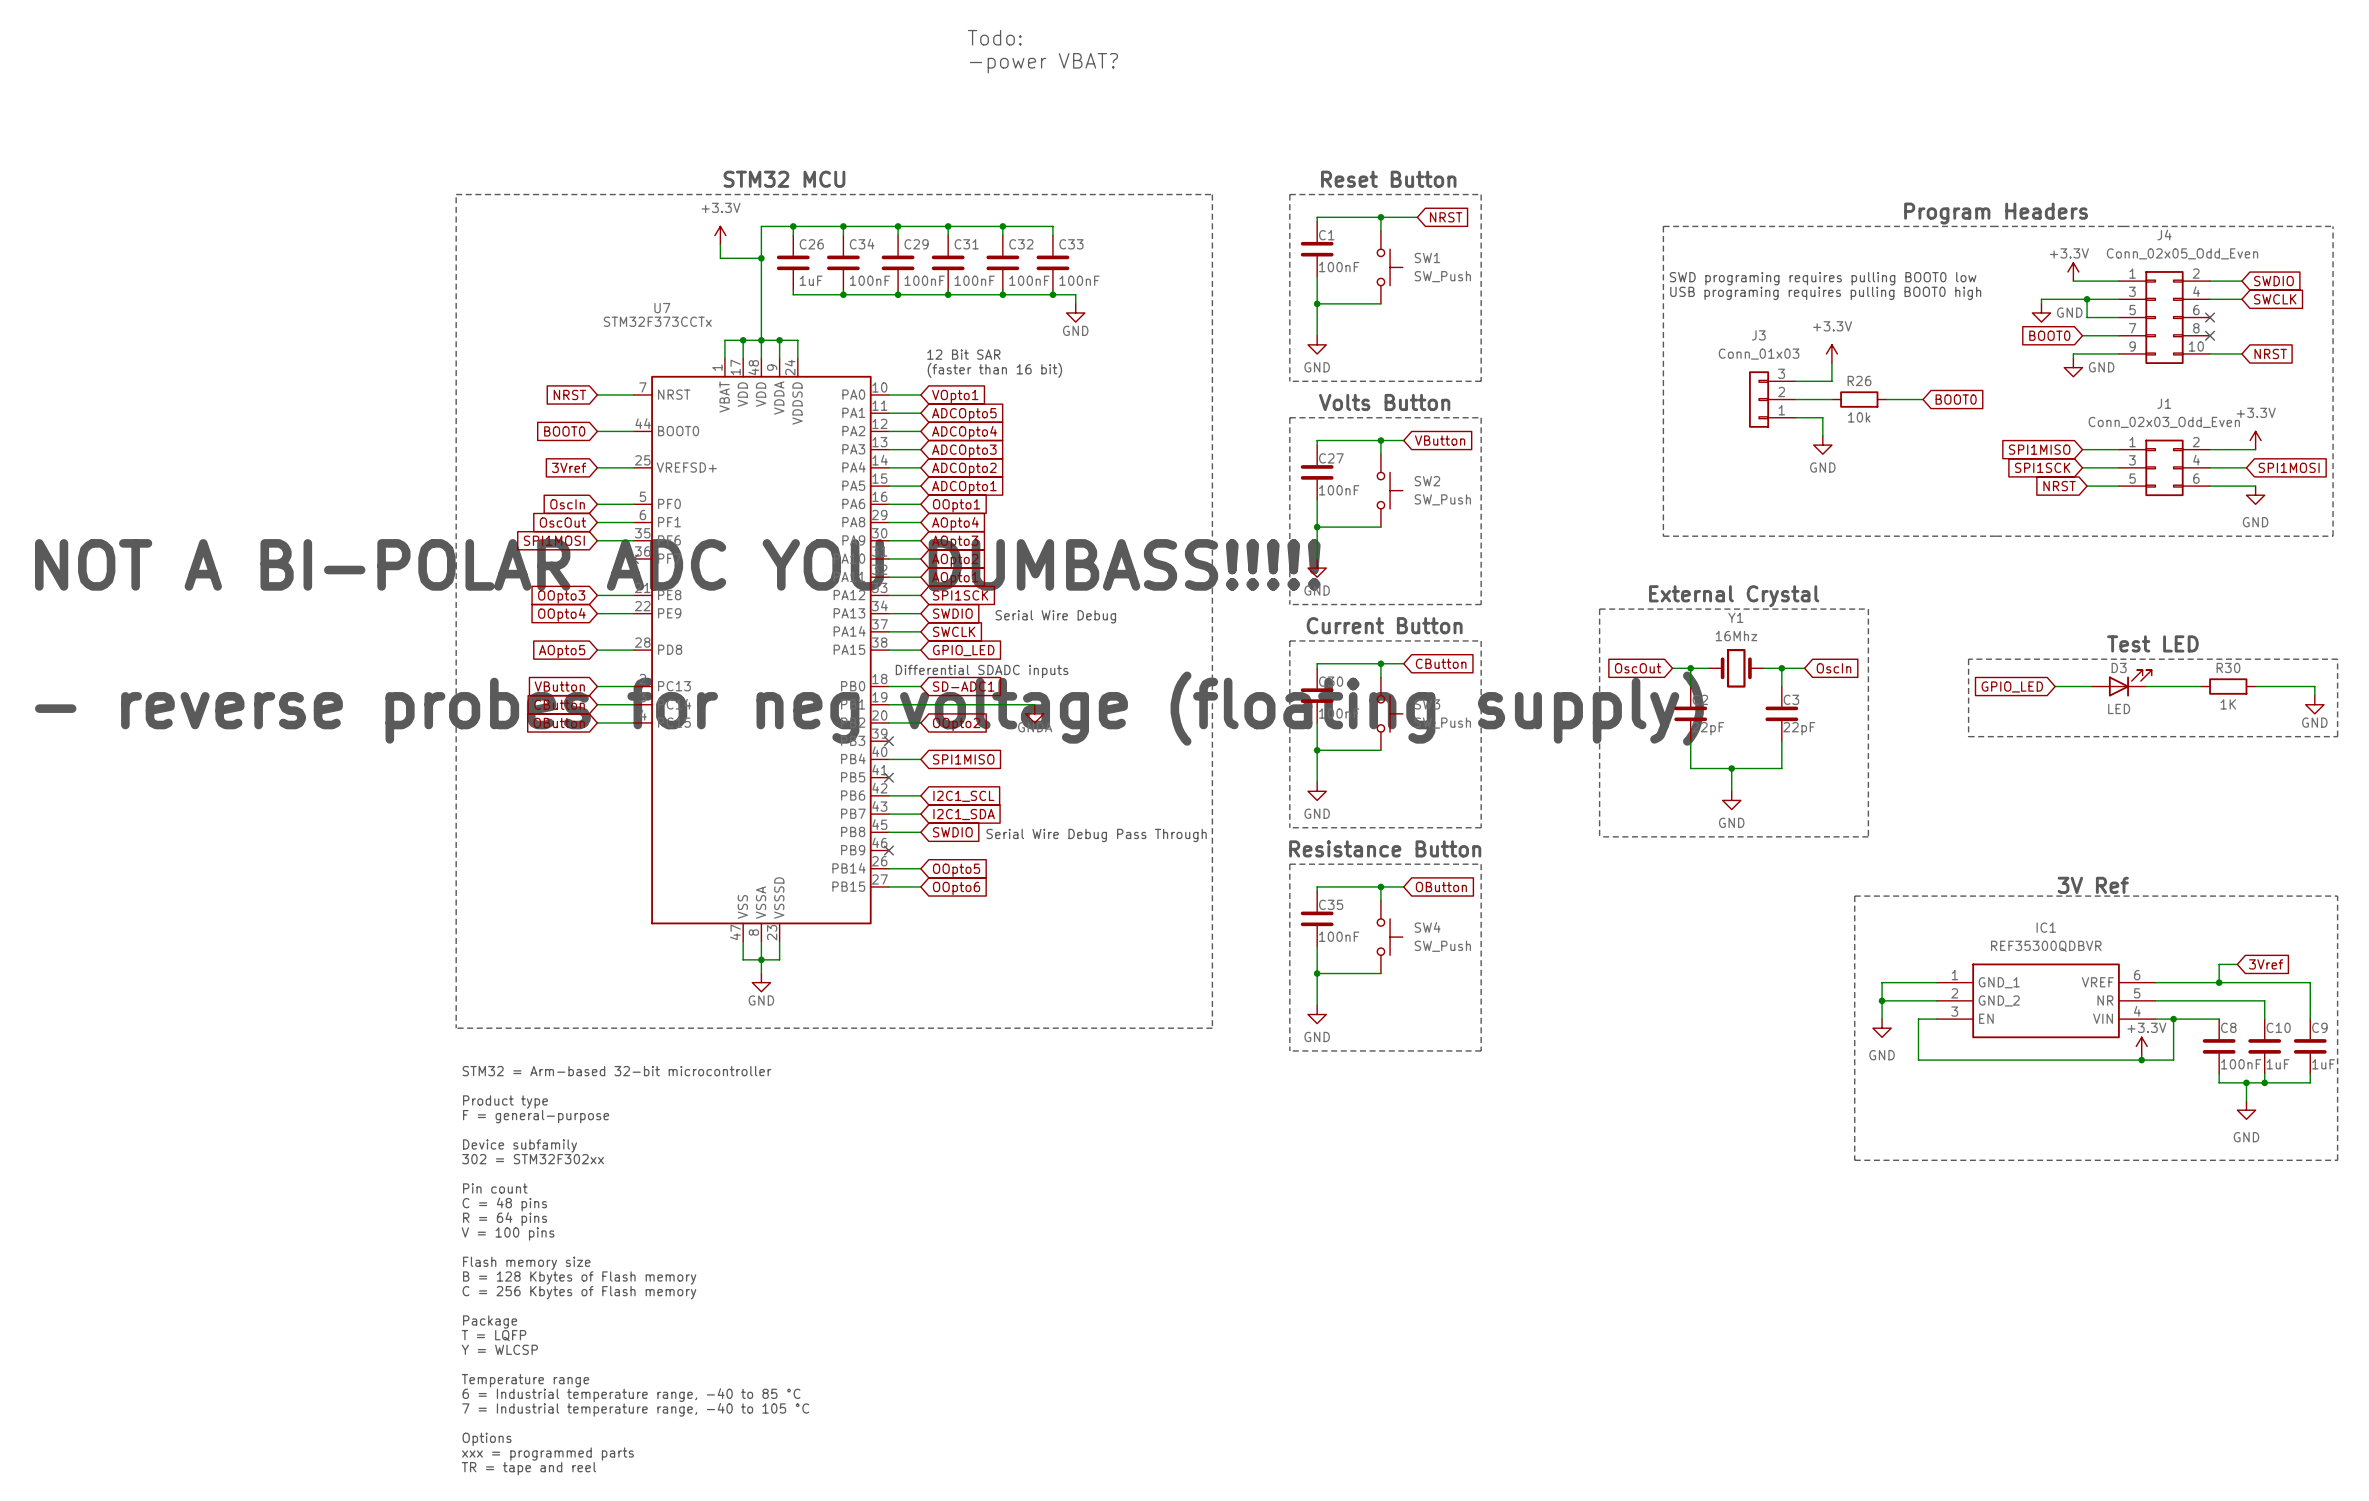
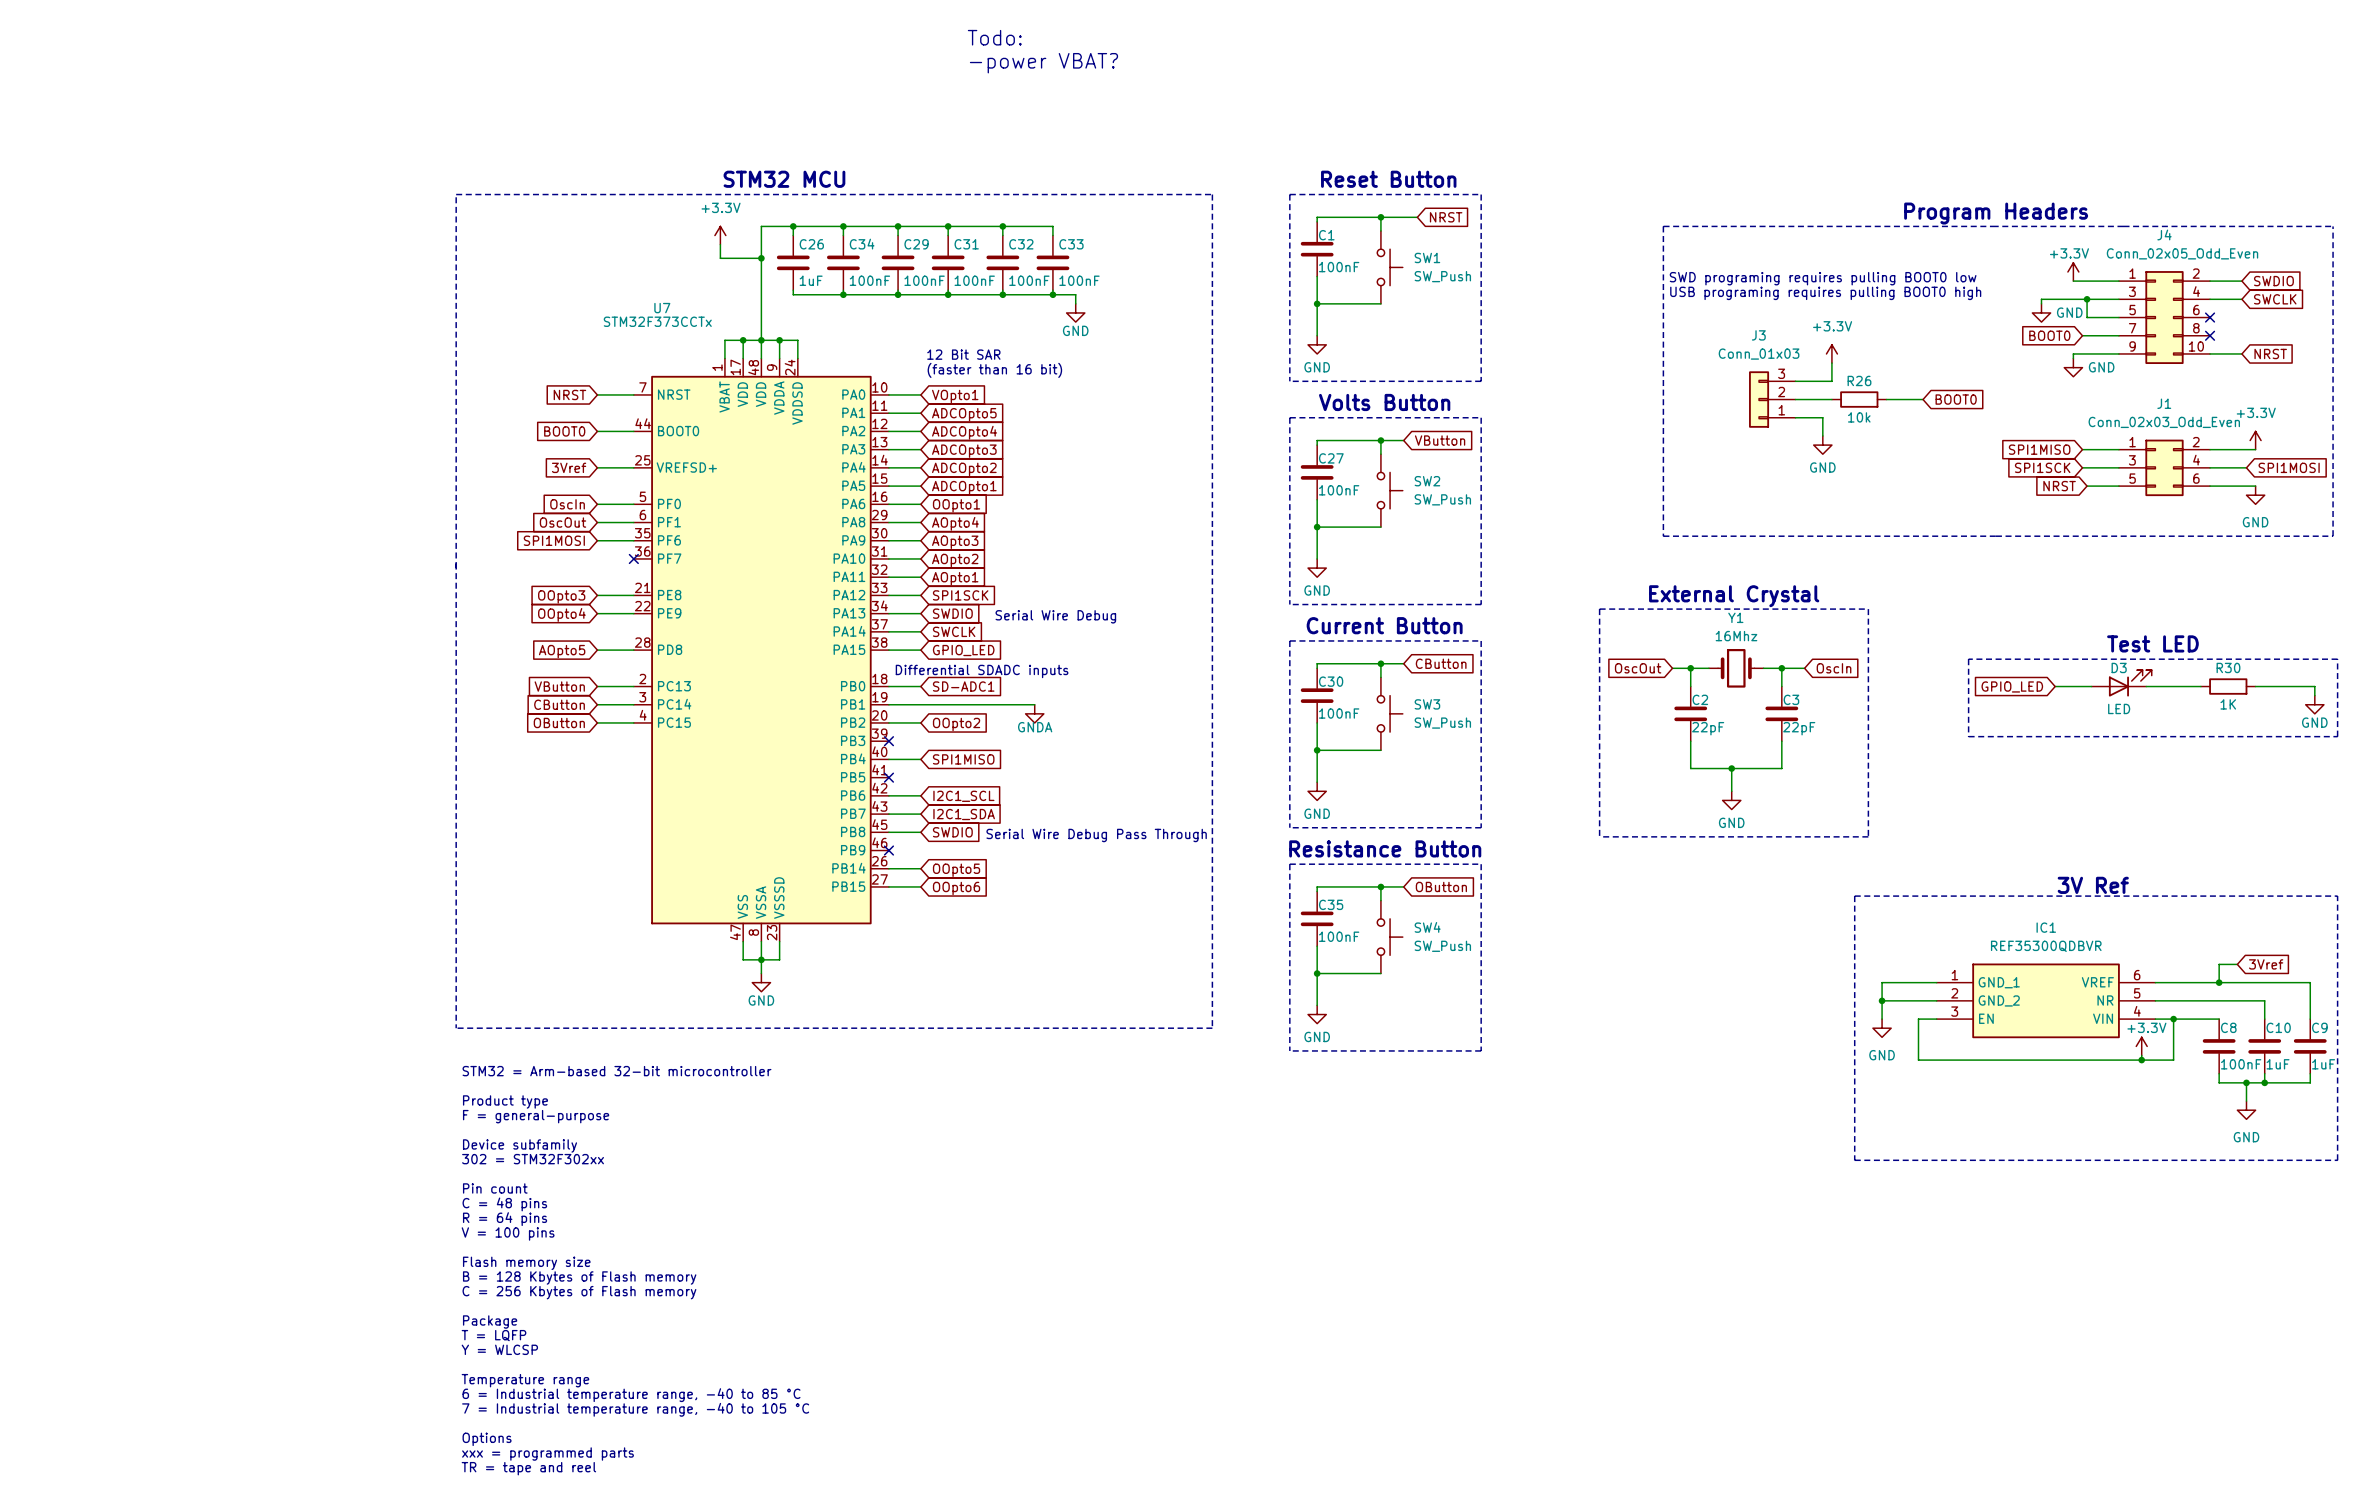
text: NOT A BI-POLAR ADC YOU DUMBASS!!!!! (677, 564) -> none
text: - reverse probes for neg voltage (floating supply) (869, 708) -> none

